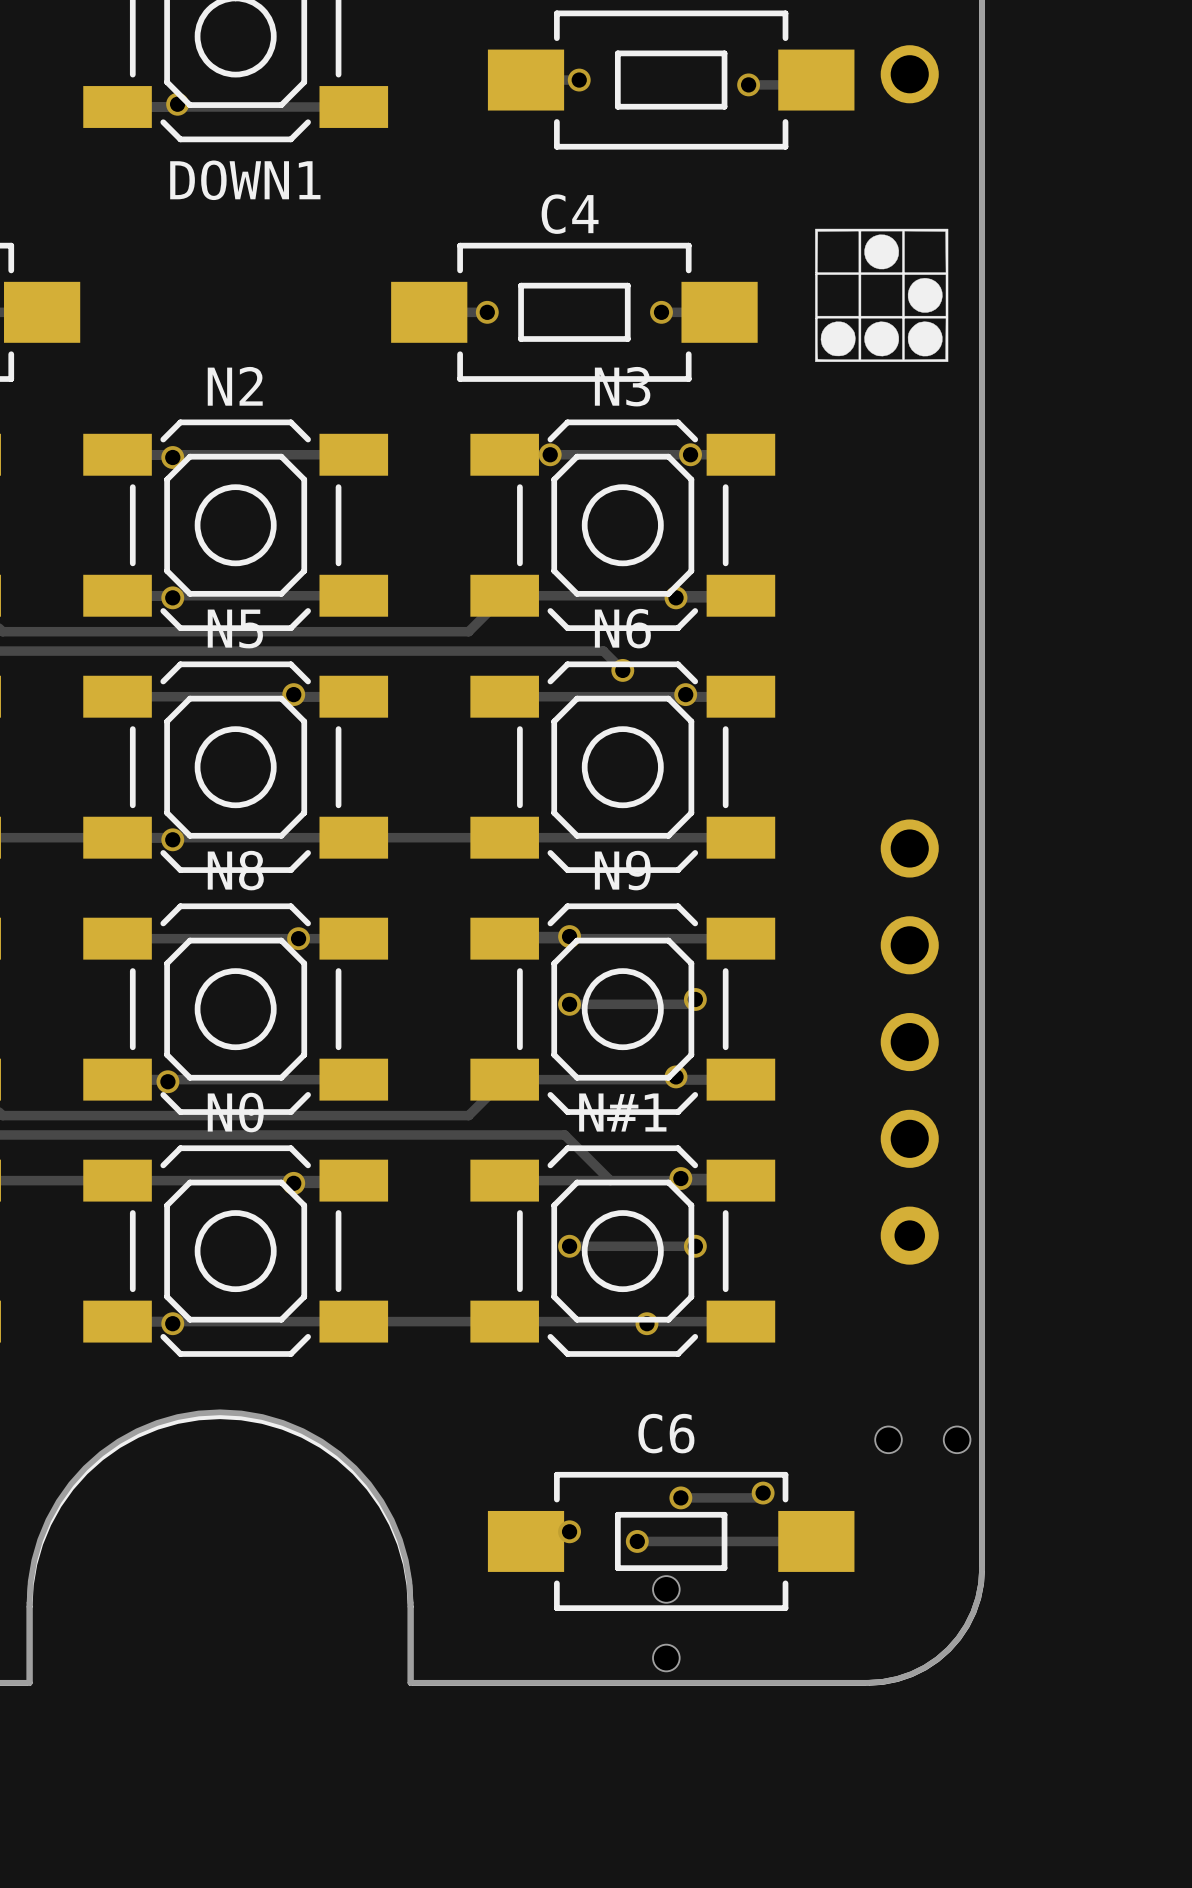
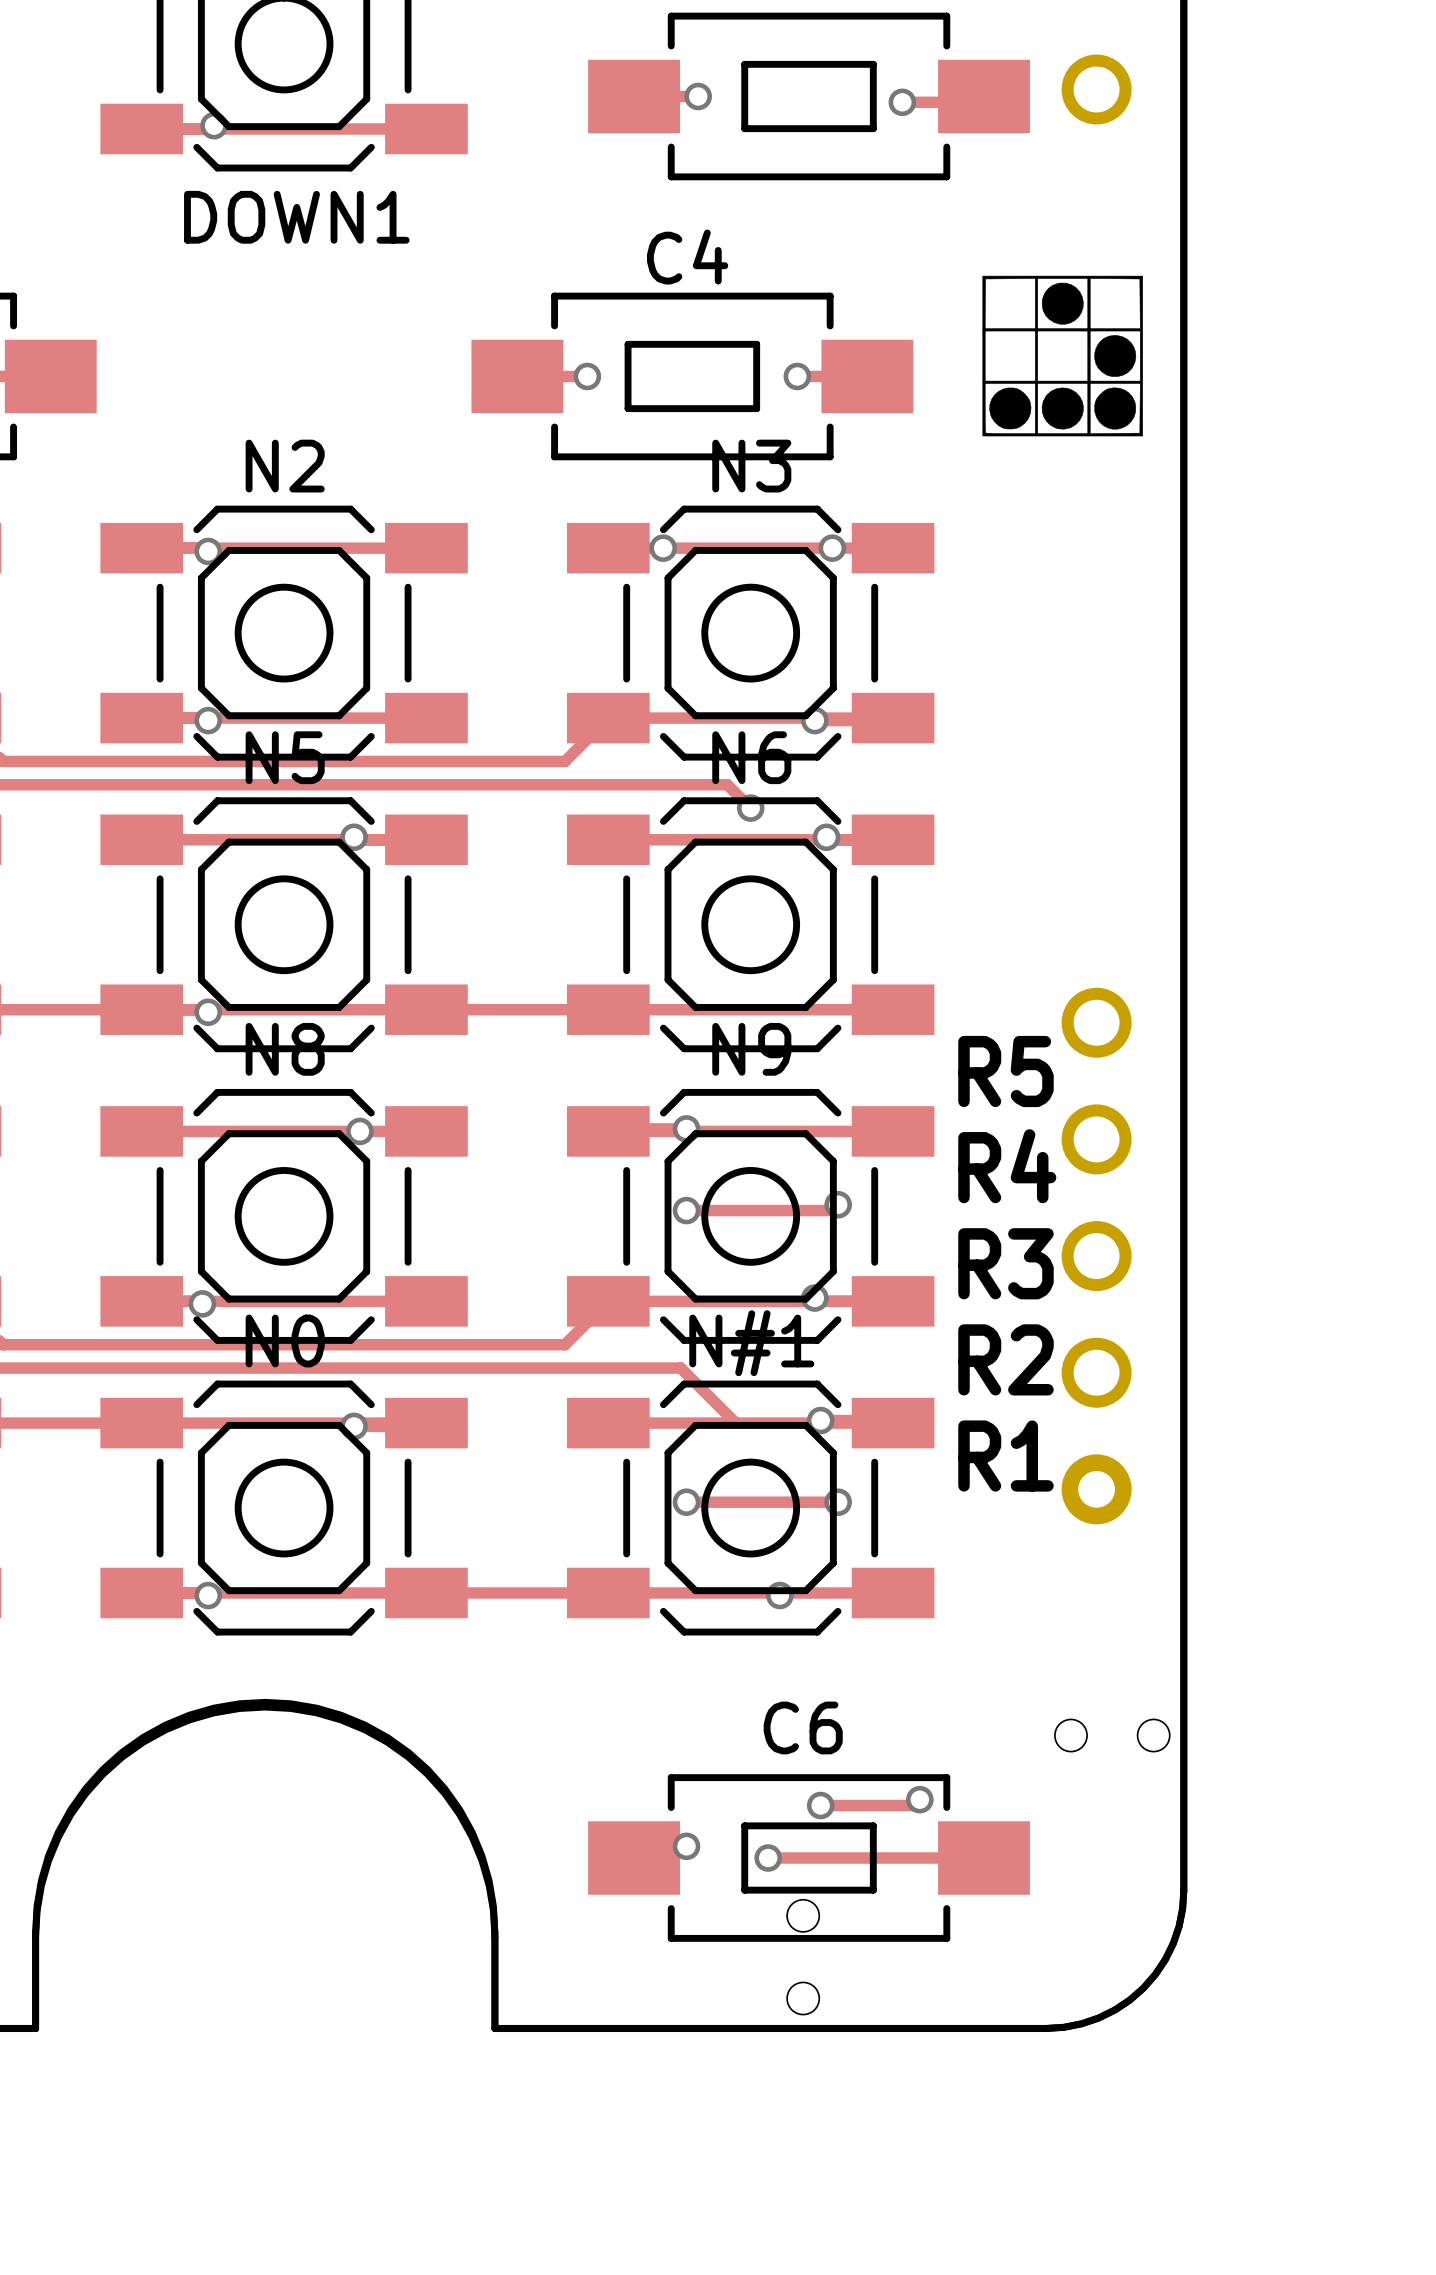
text: none -> R5 (1005, 1071)
text: none -> R4 (1007, 1166)
text: none -> R3 (1005, 1263)
text: none -> R2 (1005, 1359)
text: none -> R1 (1005, 1456)

